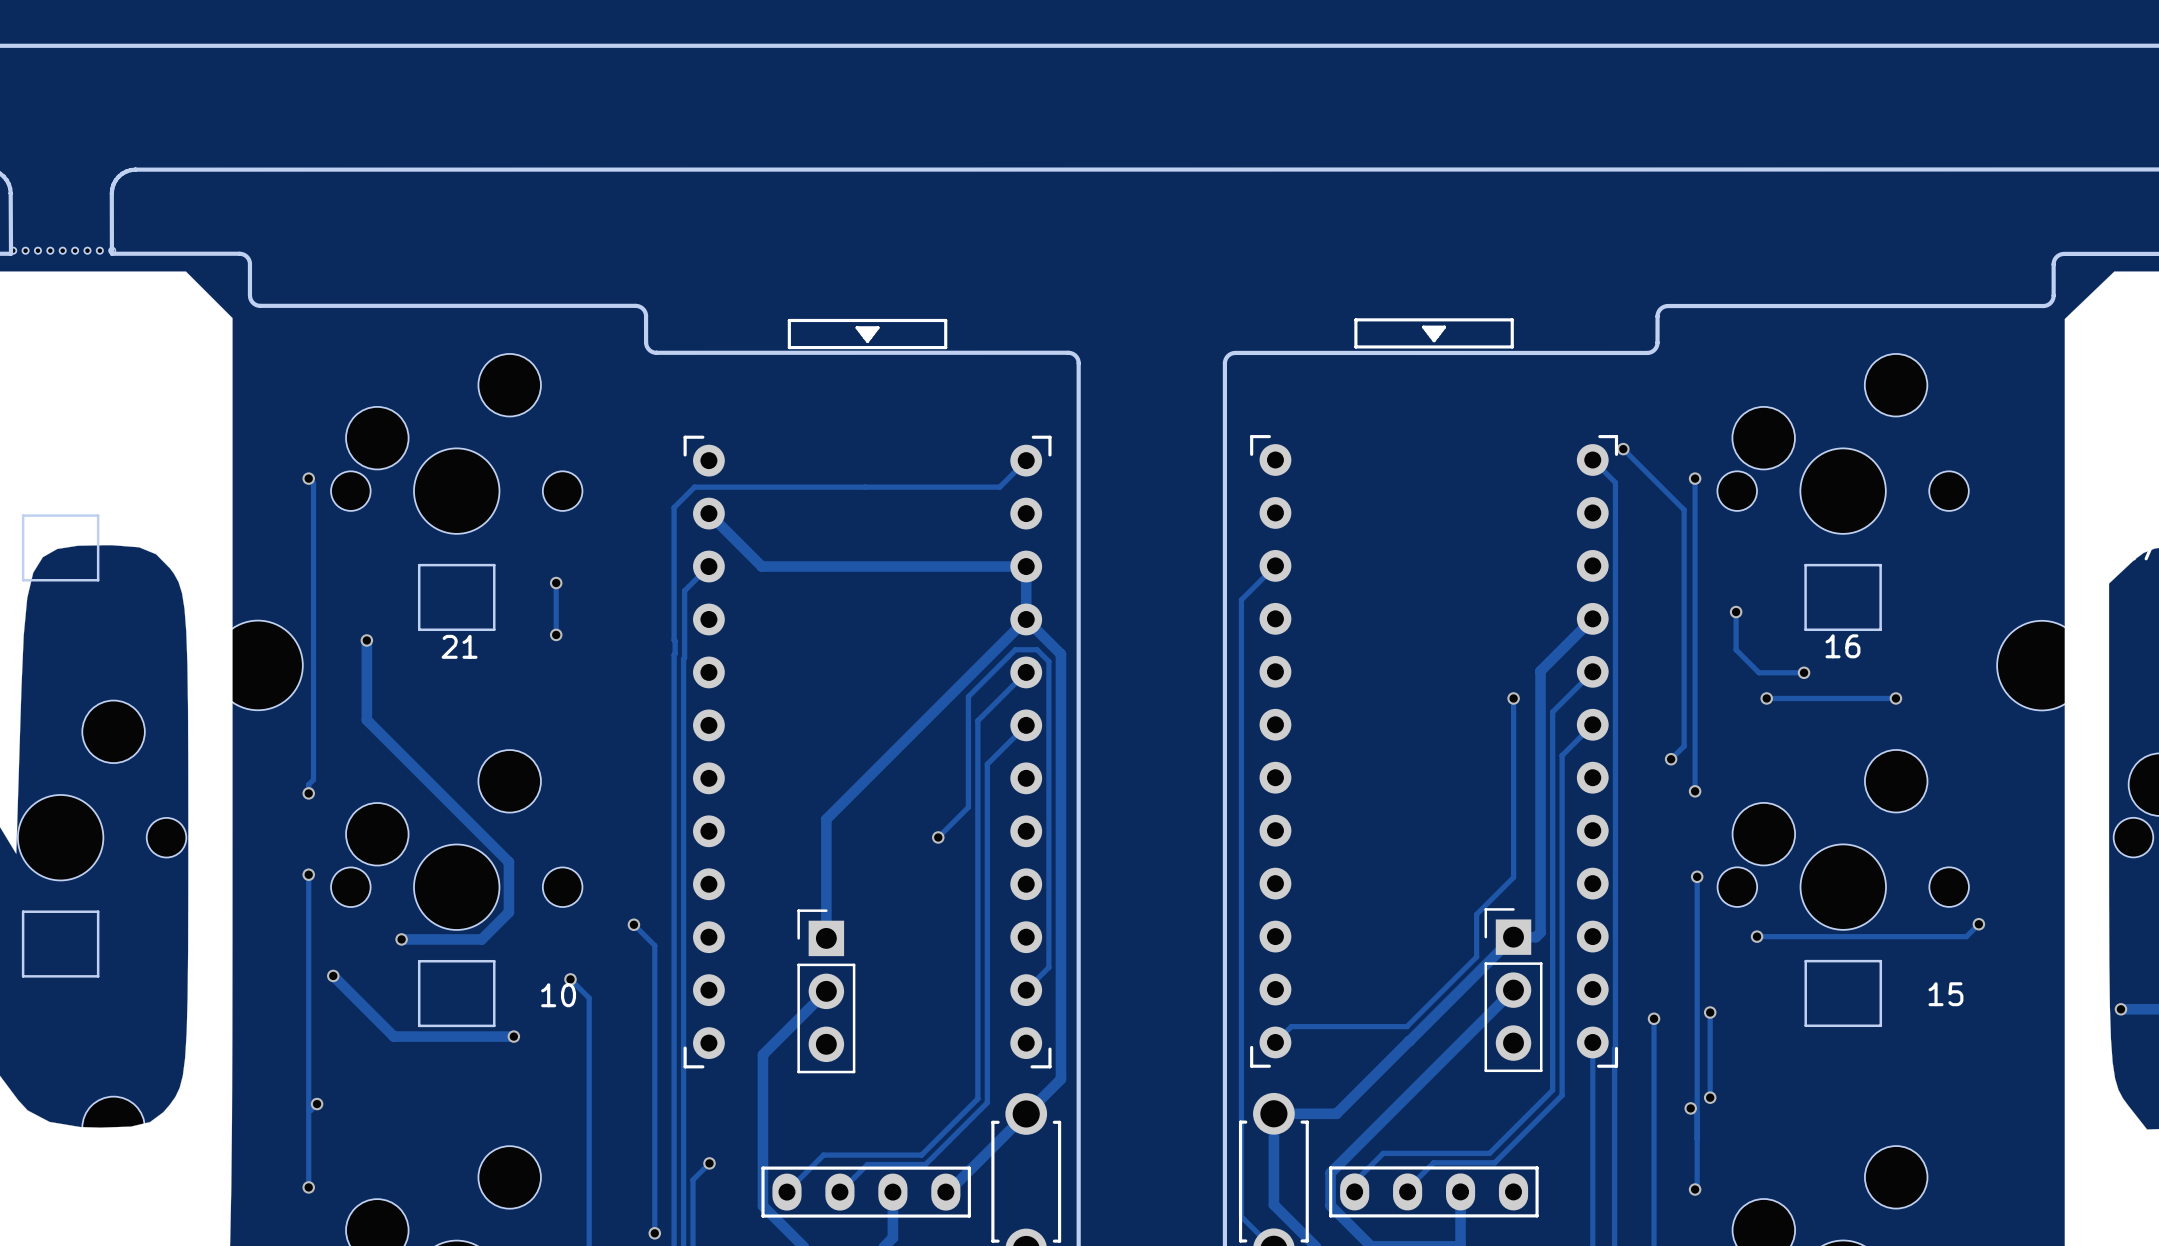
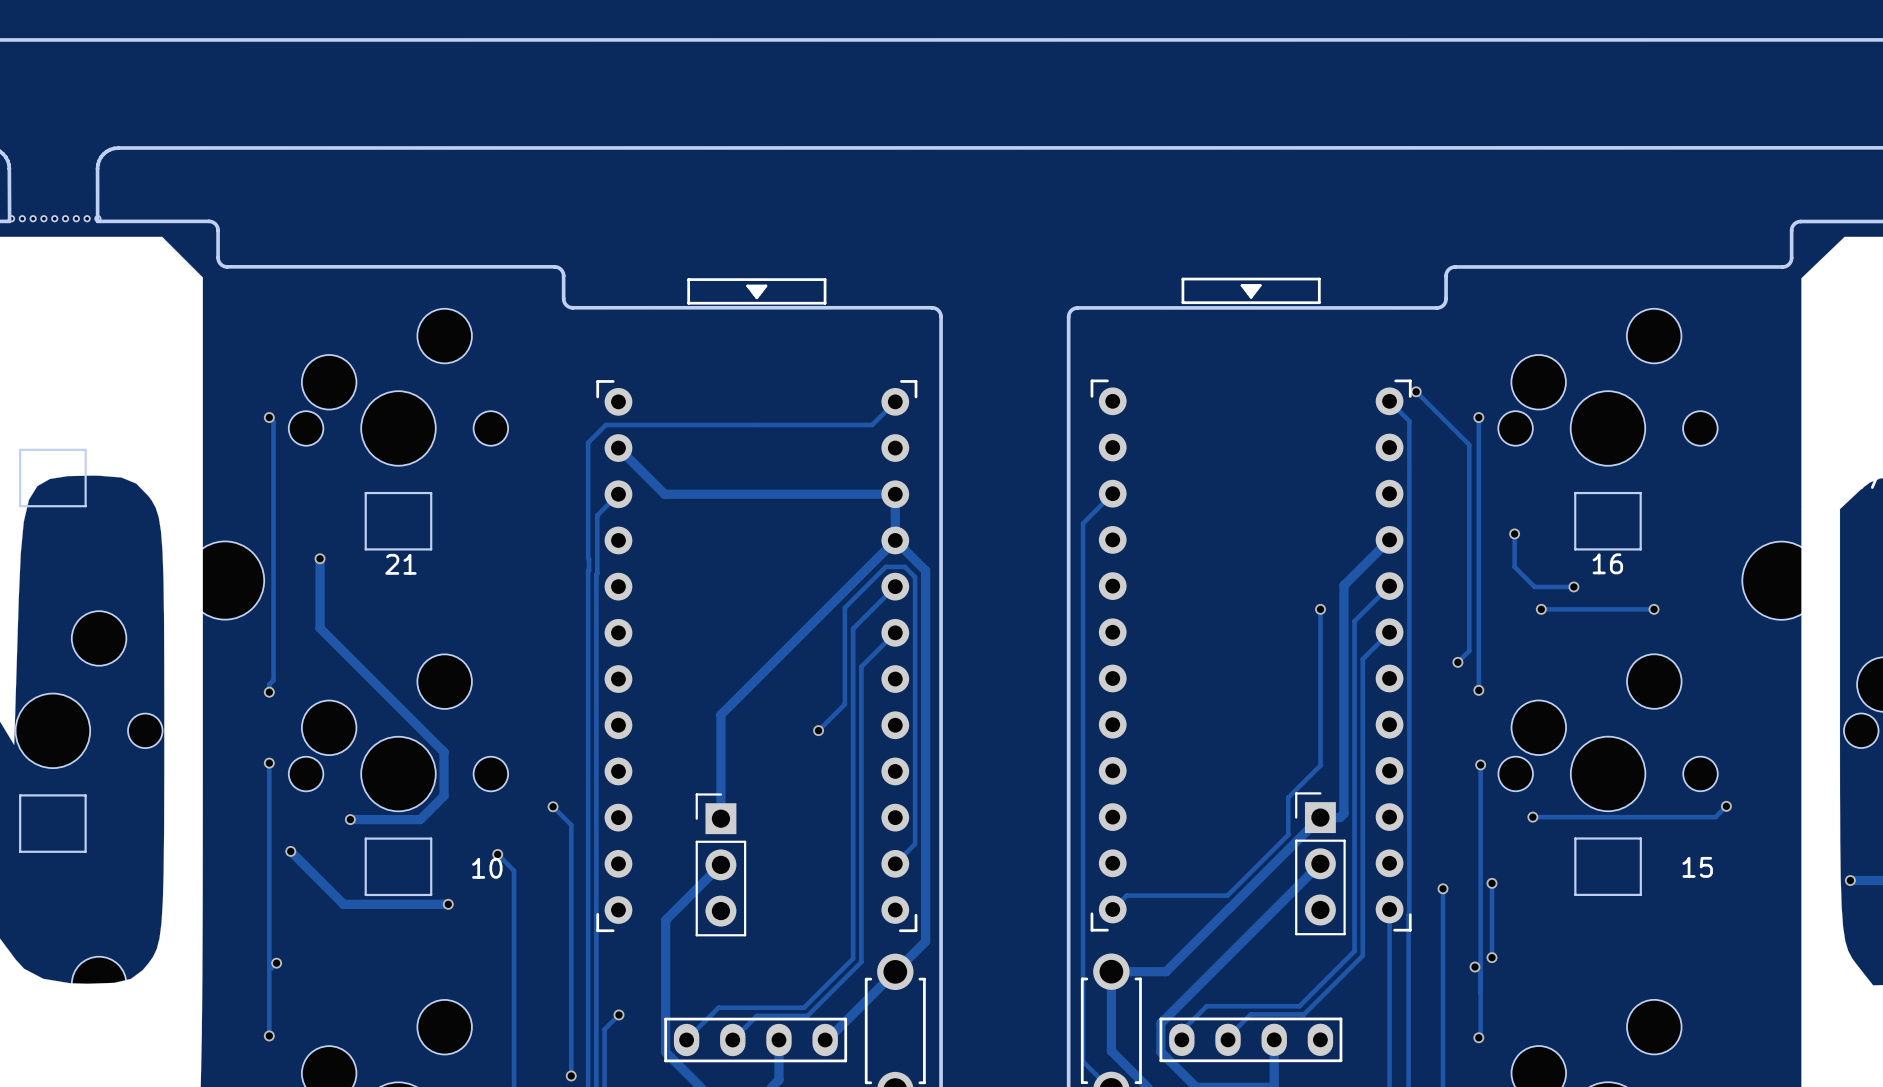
track: (556, 583) (556, 634) -> none
via: (556, 583) -> none
via: (556, 634) -> none

